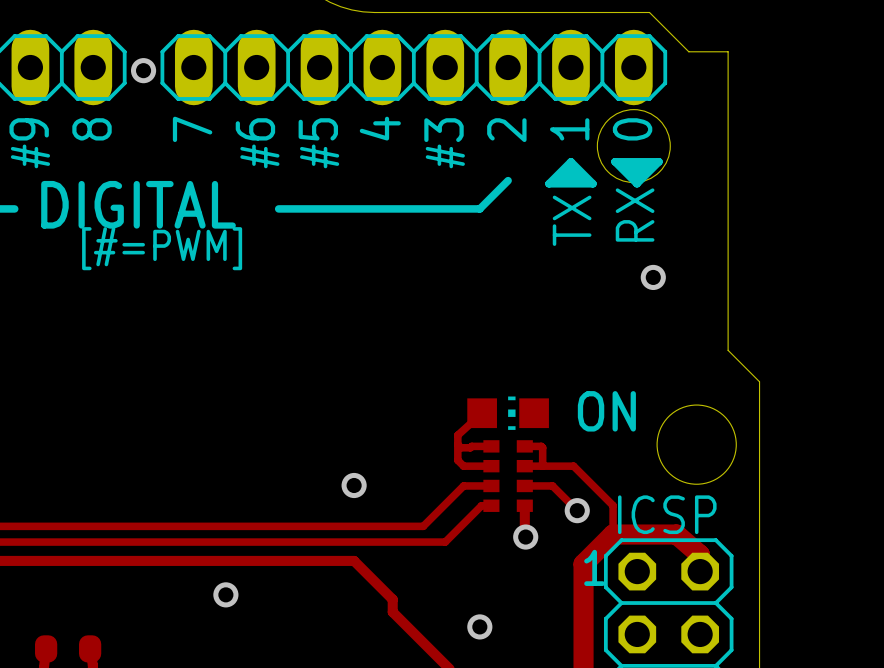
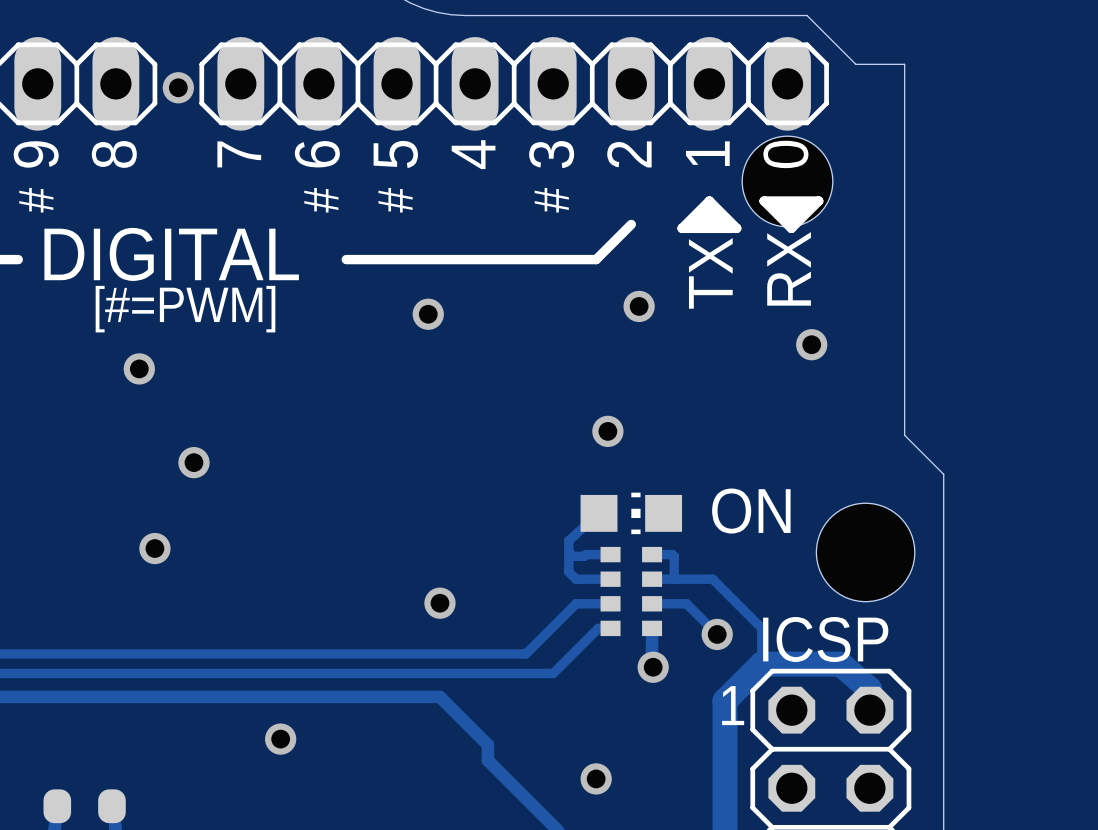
via: none -> (639, 306)
via: none -> (428, 314)
via: none -> (139, 368)
via: none -> (607, 431)
via: none -> (193, 462)
via: none -> (154, 548)

